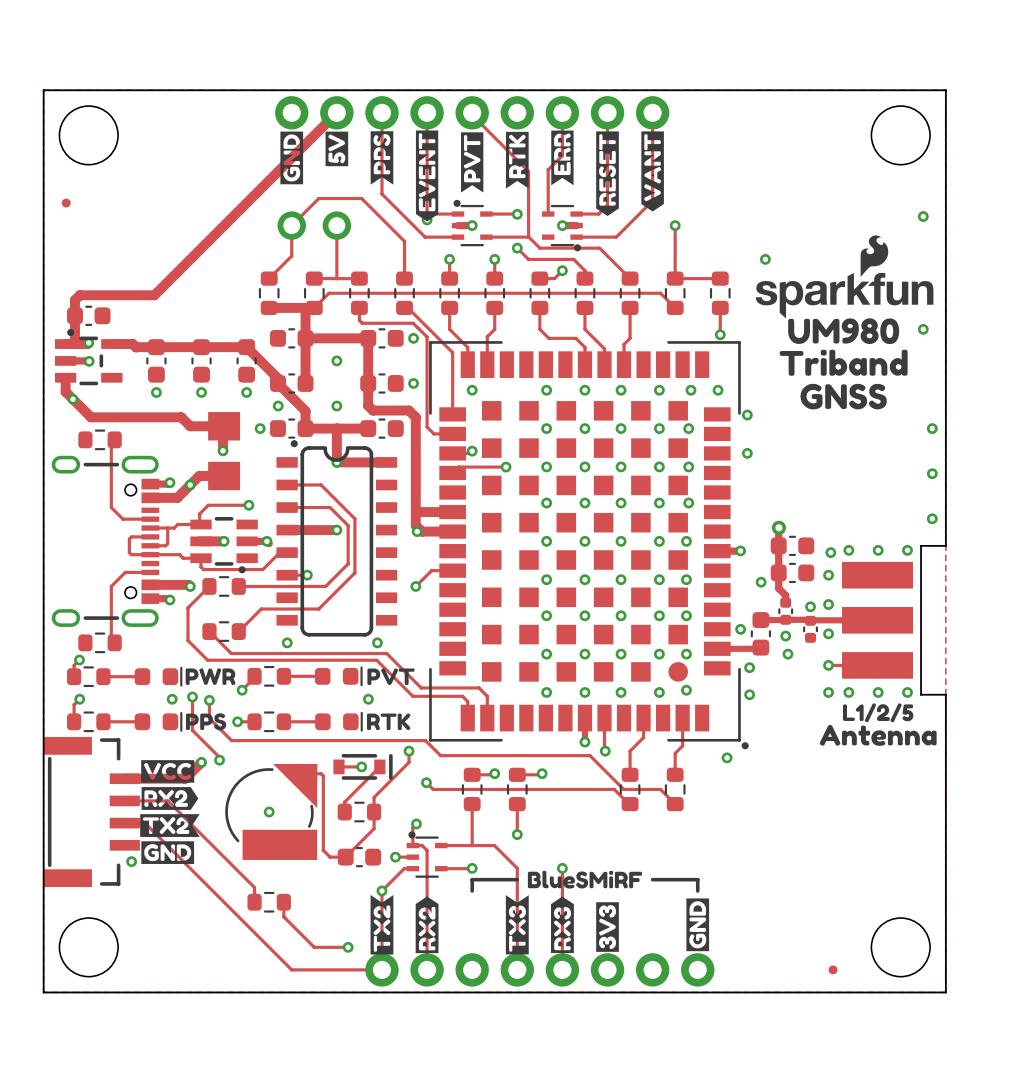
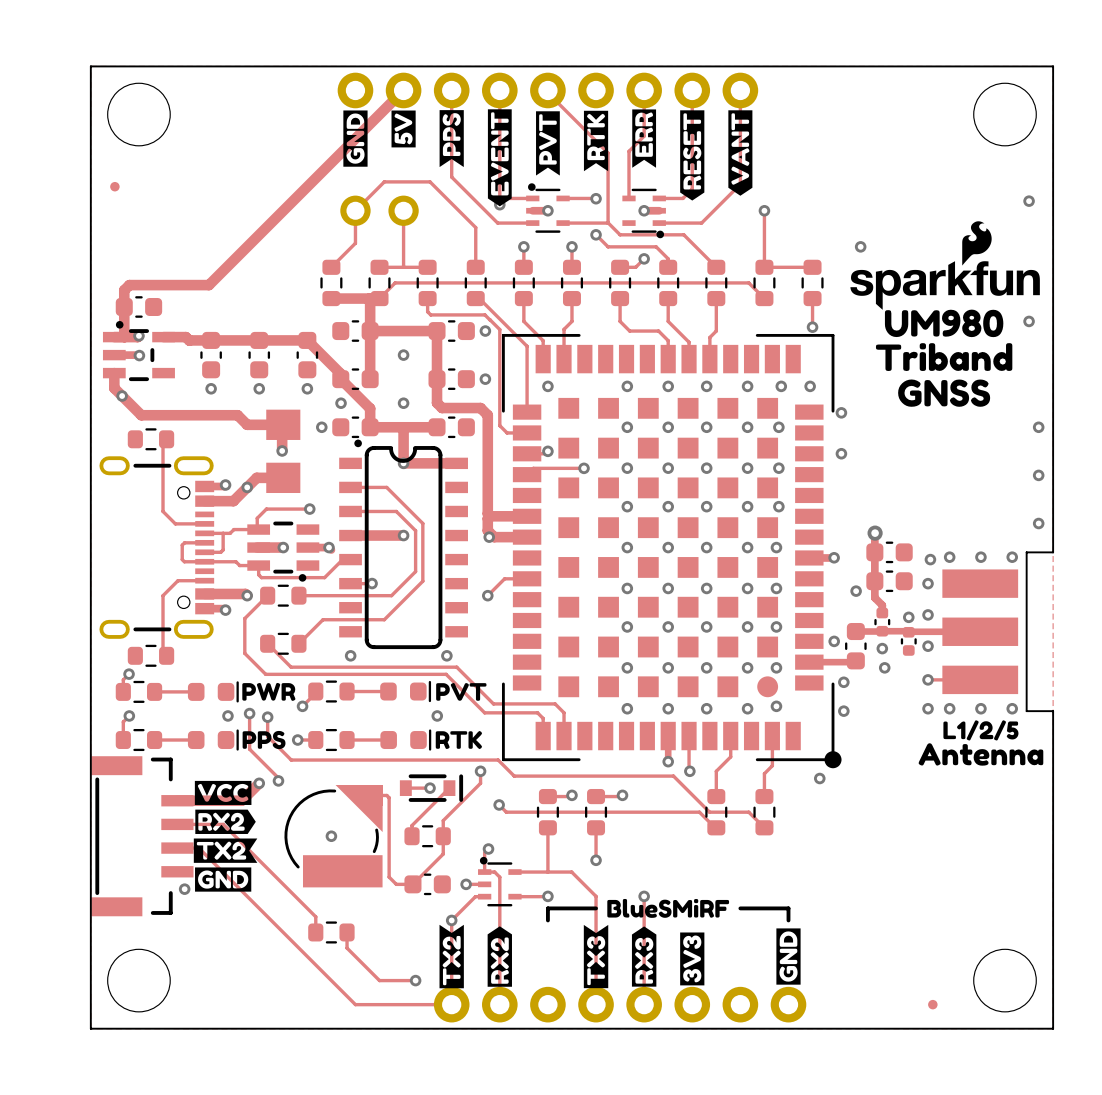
part footprint: [429, 341, 749, 750] -> [501, 333, 842, 769]

